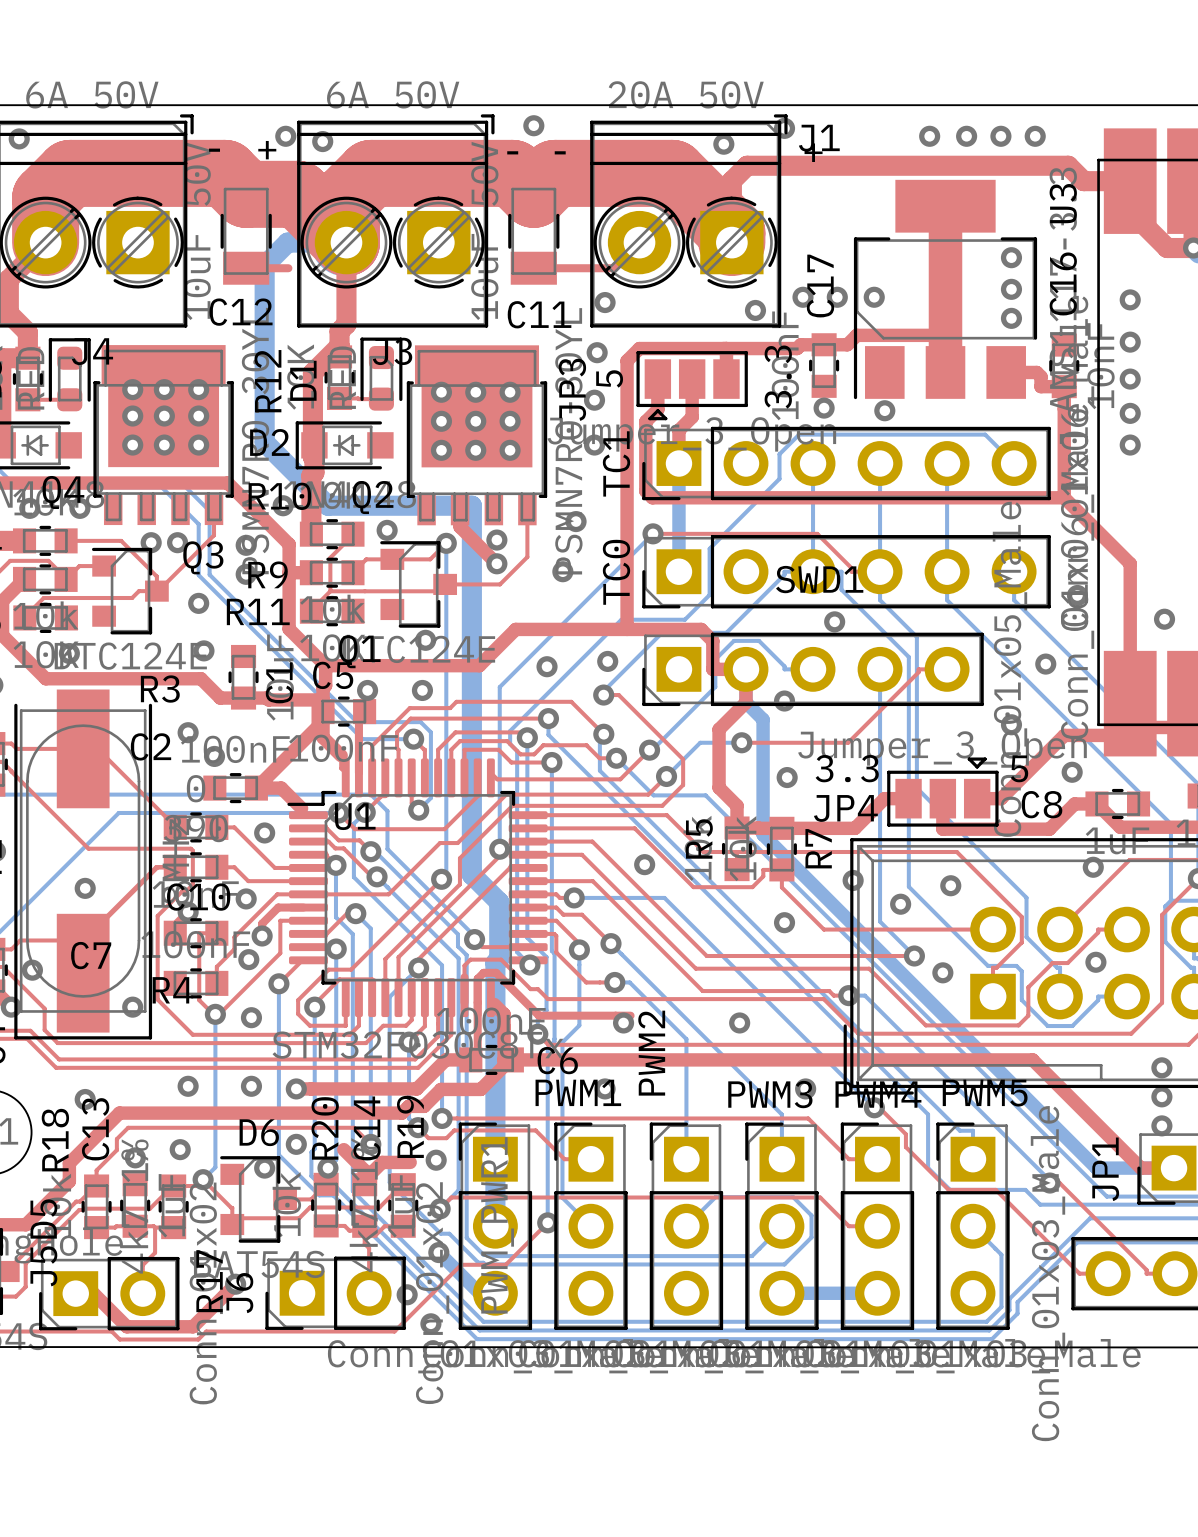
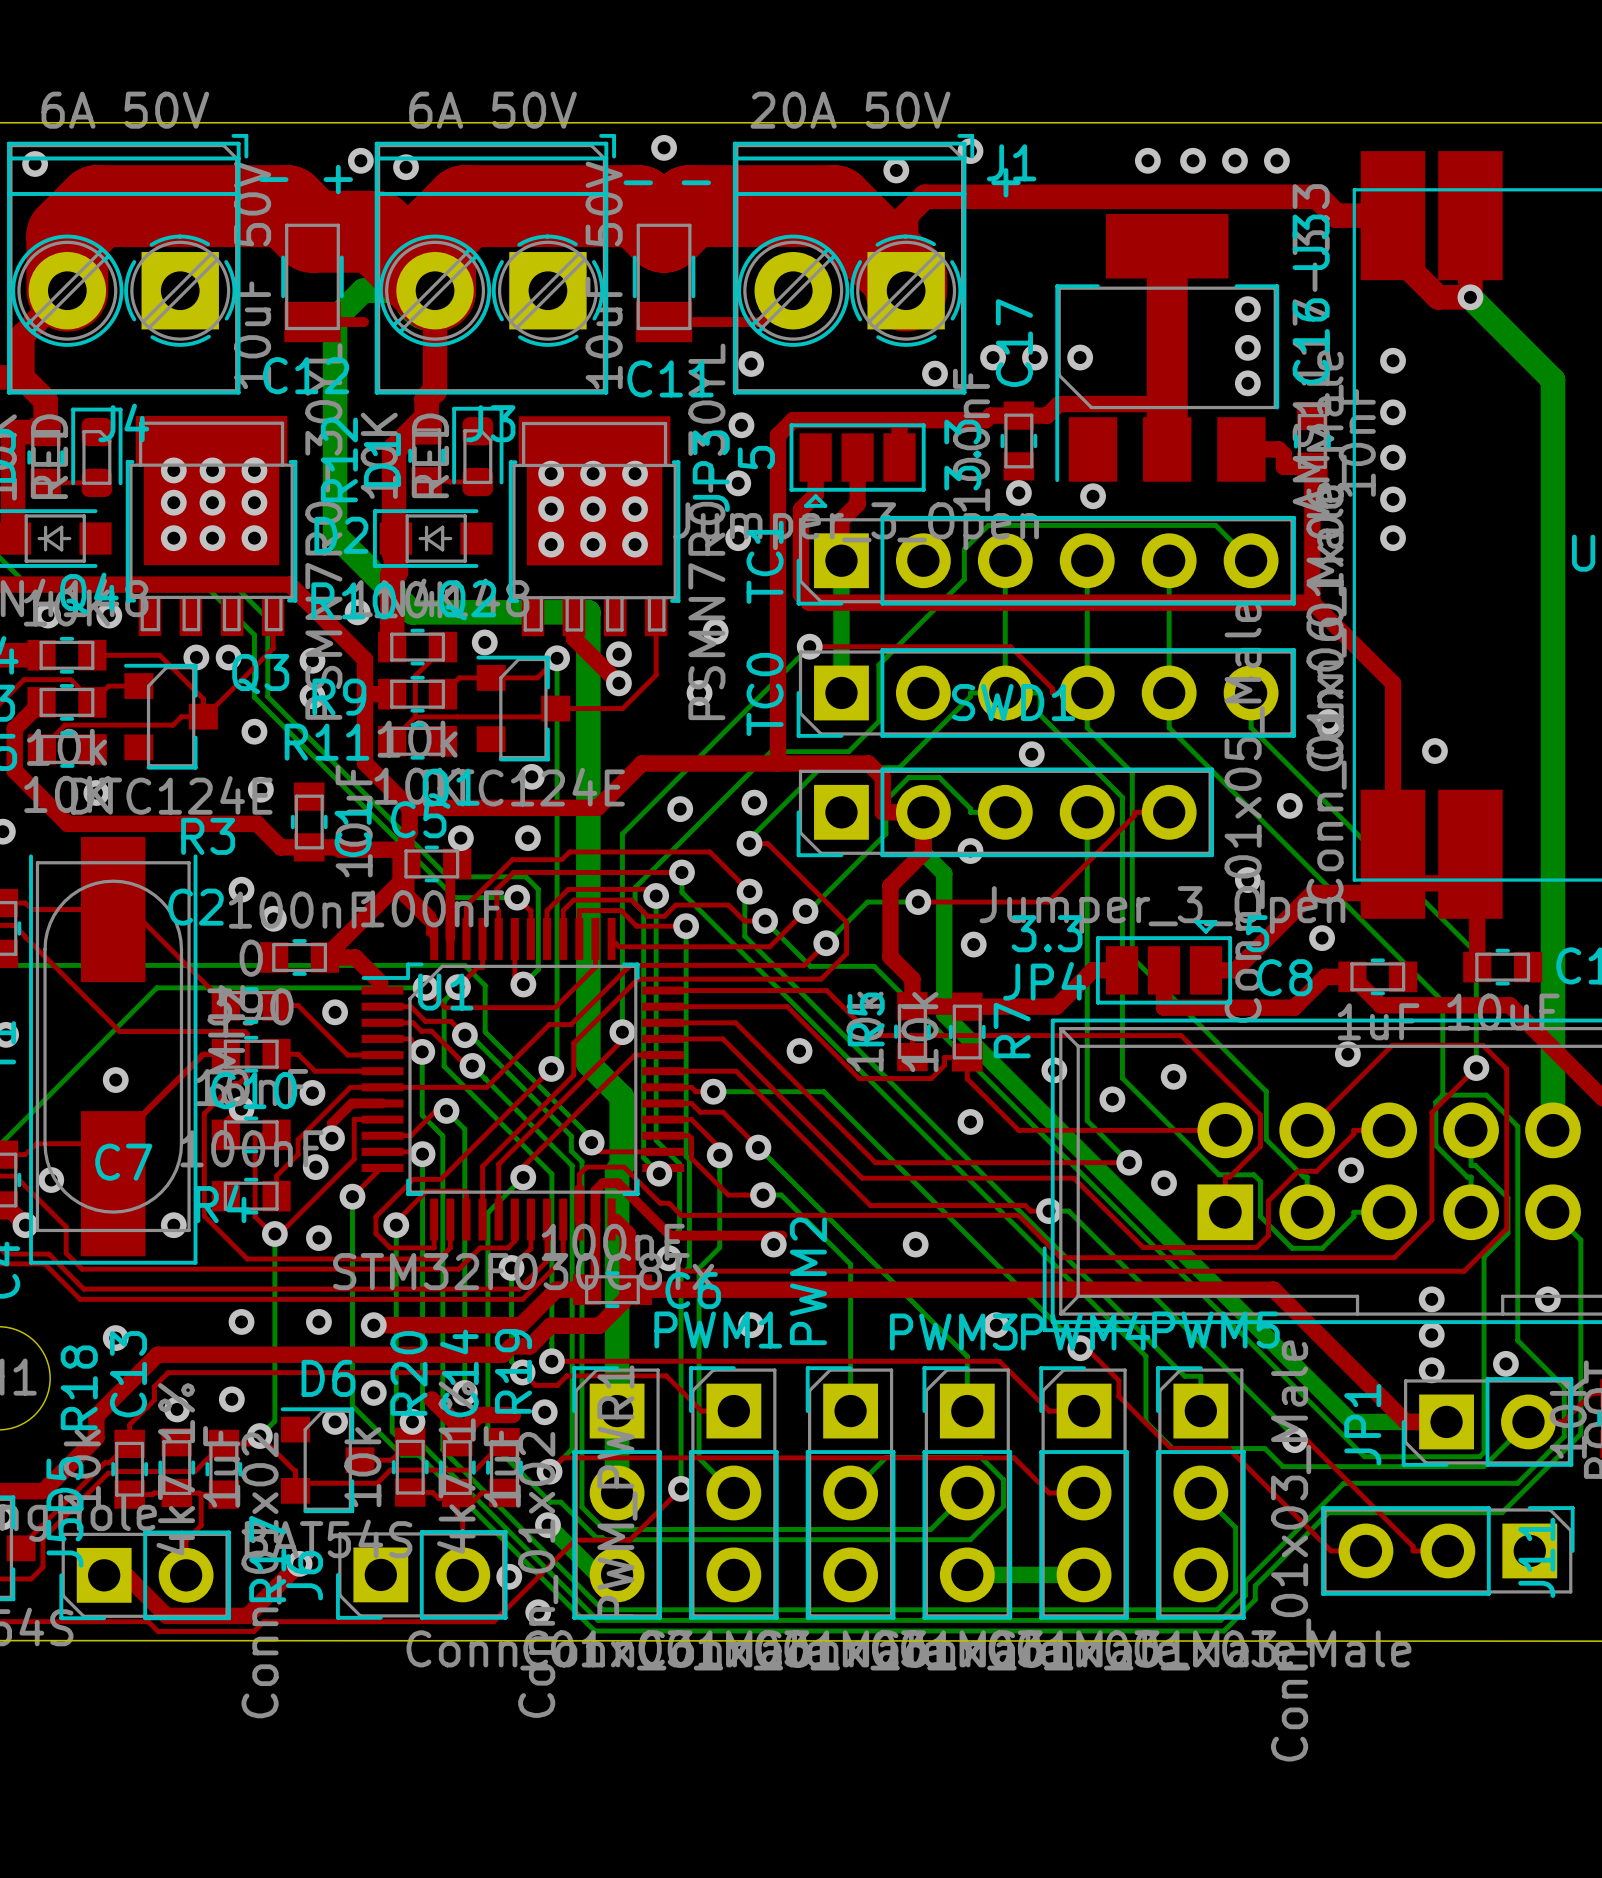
U1 footprint: [287, 758, 548, 1018] -> [361, 917, 685, 1241]

